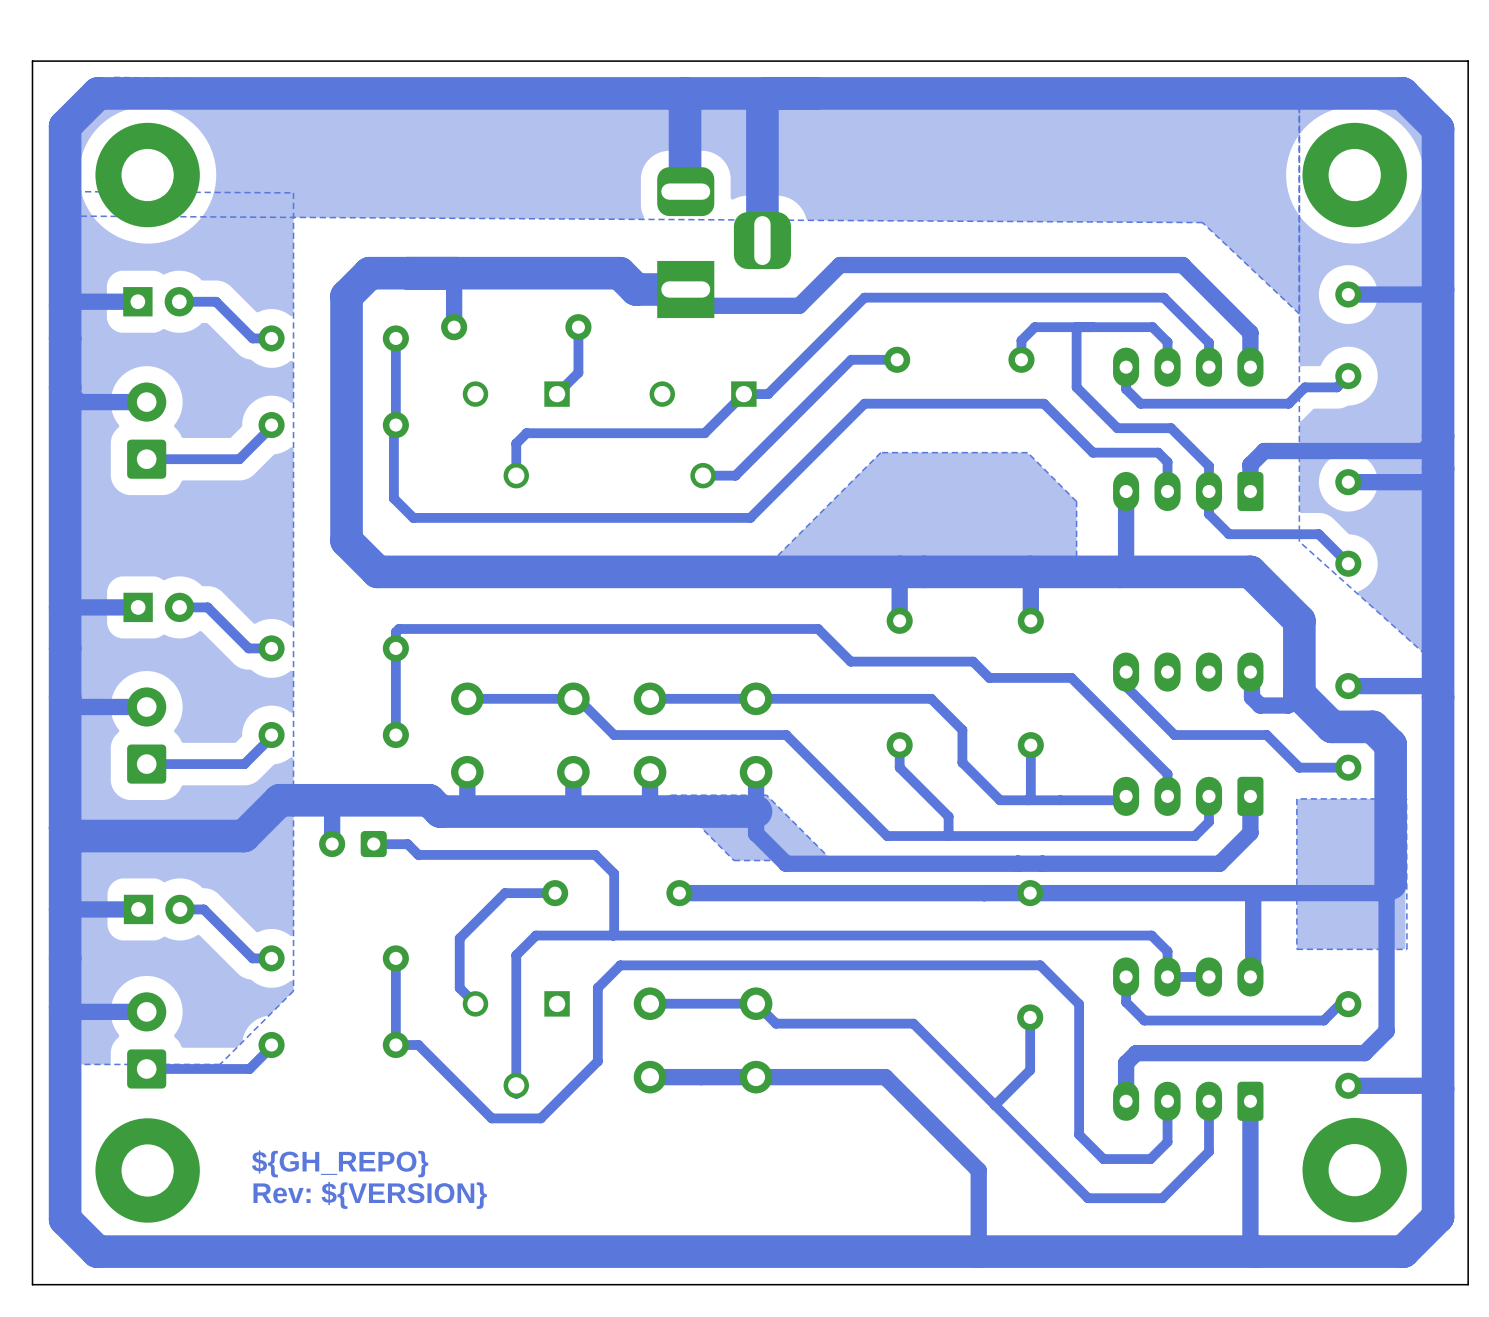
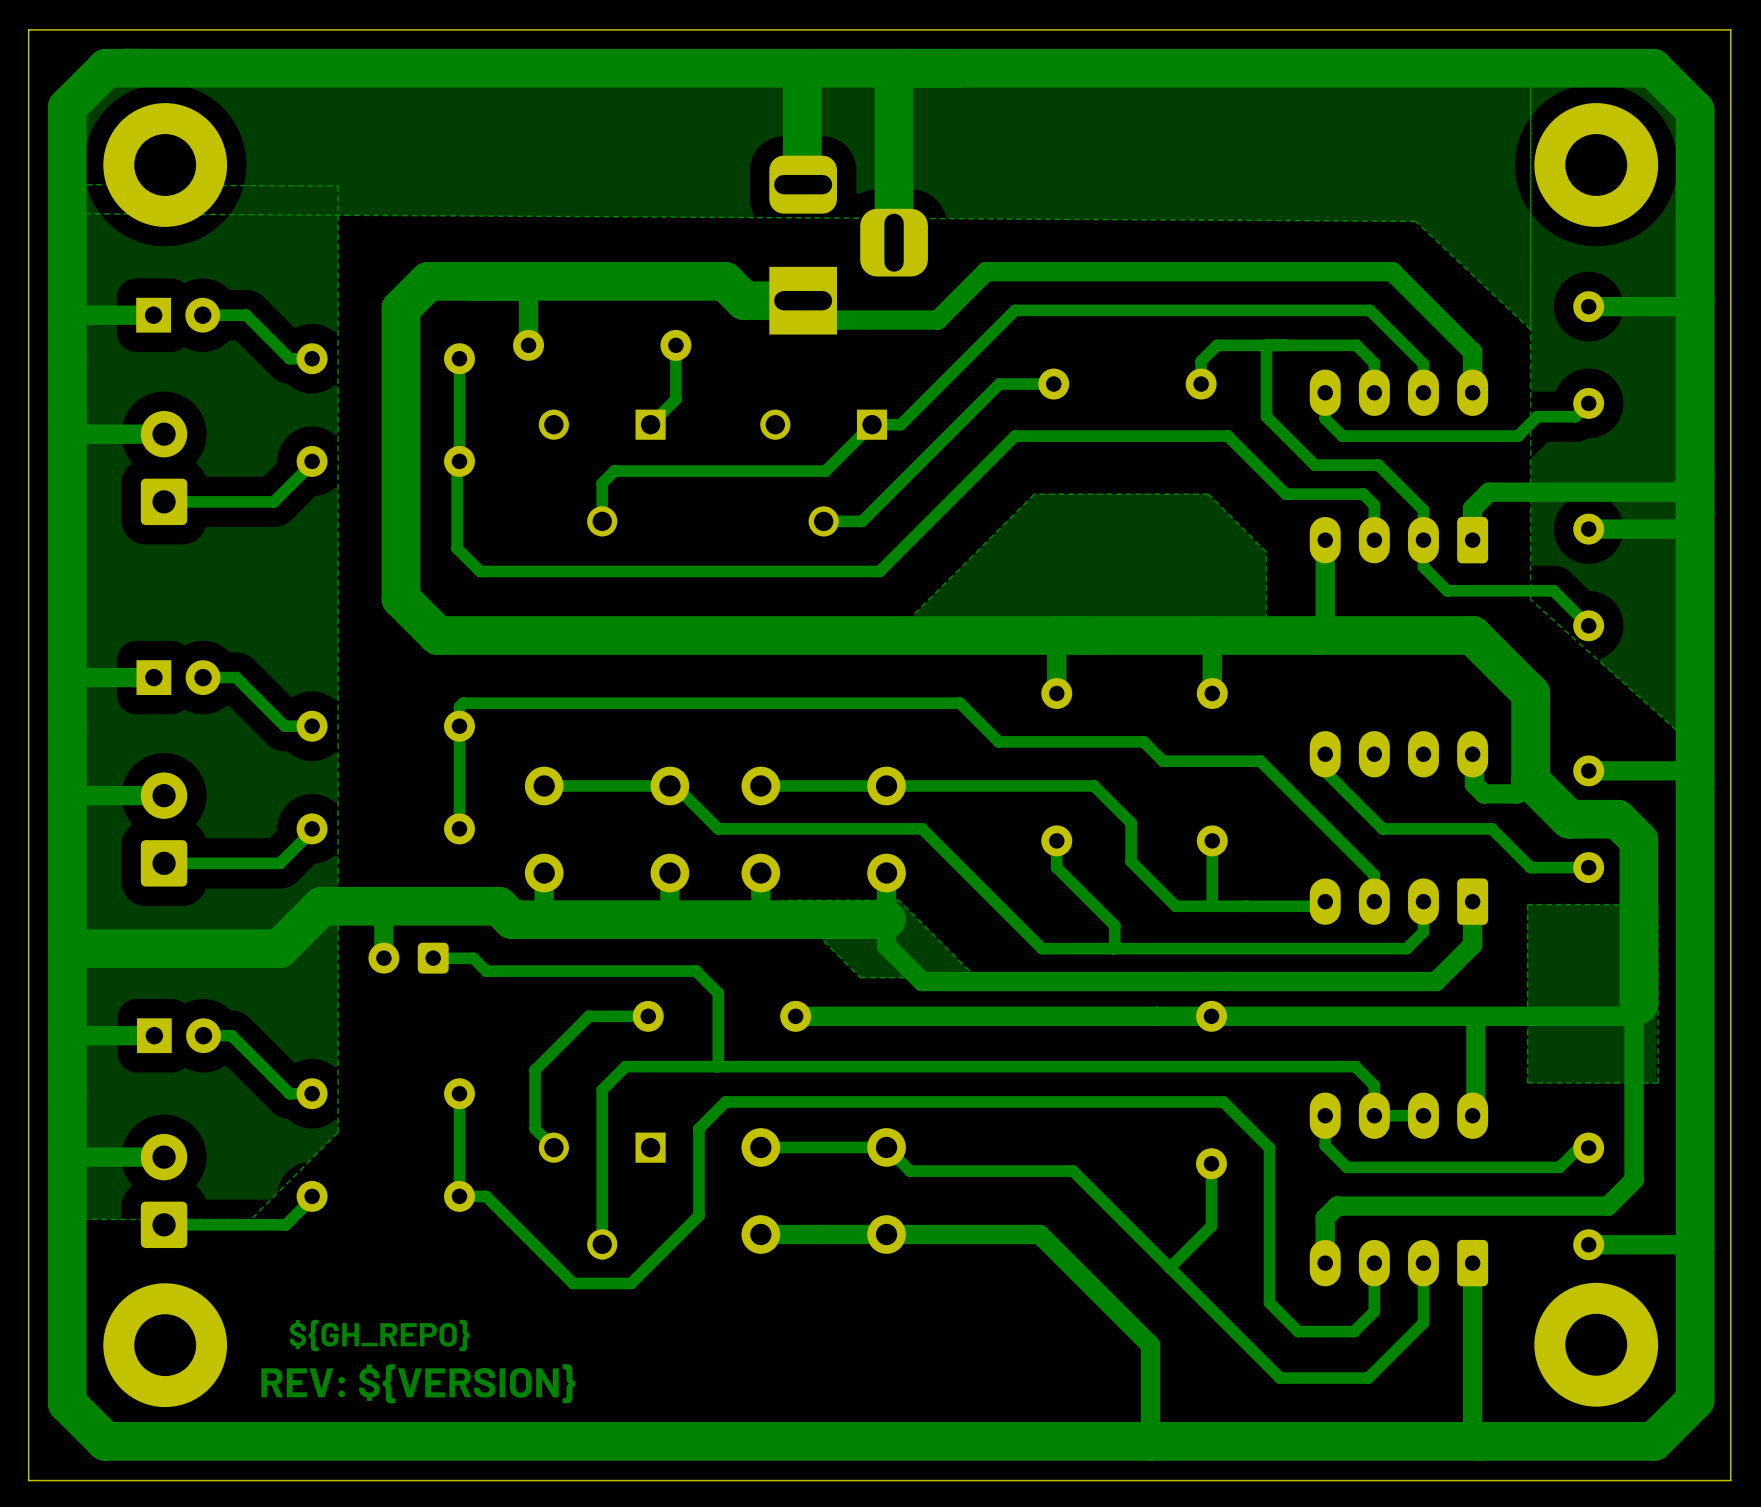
text: Rev: ${VERSION} (370, 1195) -> REV: ${VERSION} (418, 1383)

